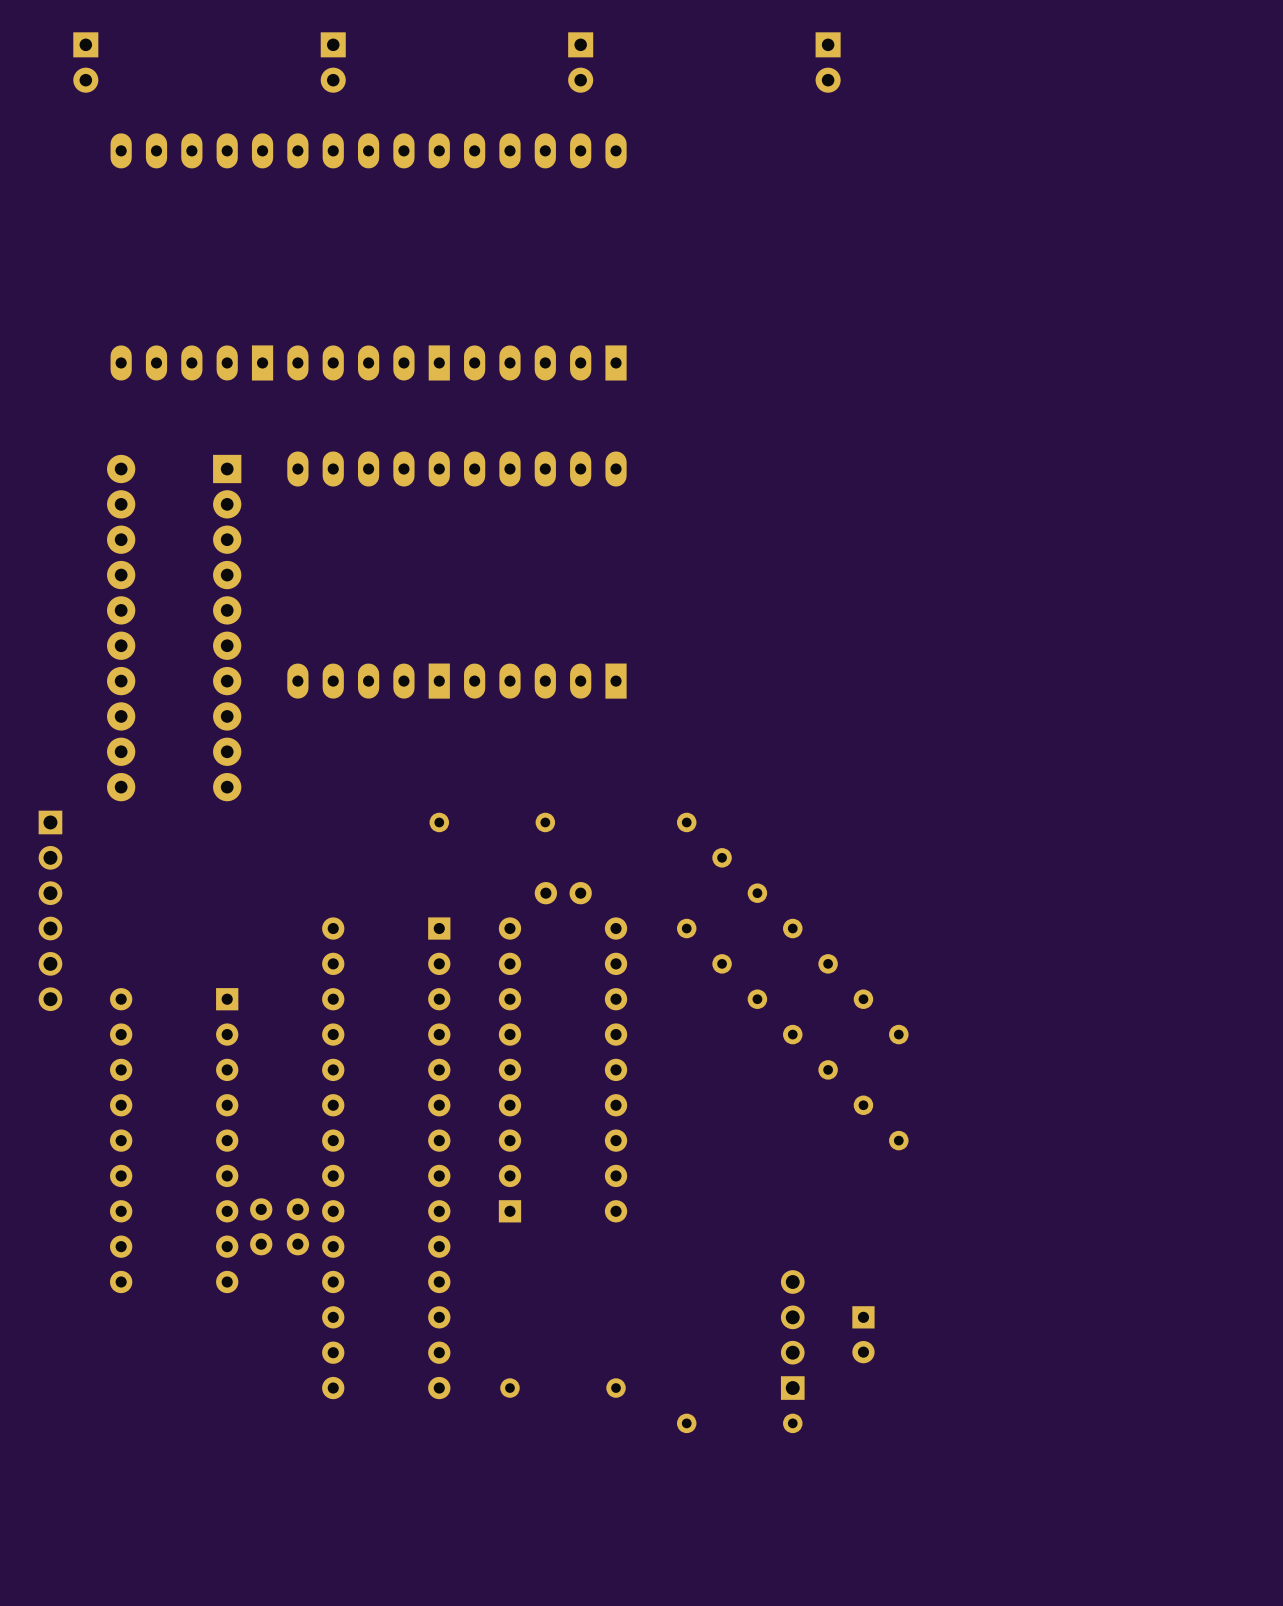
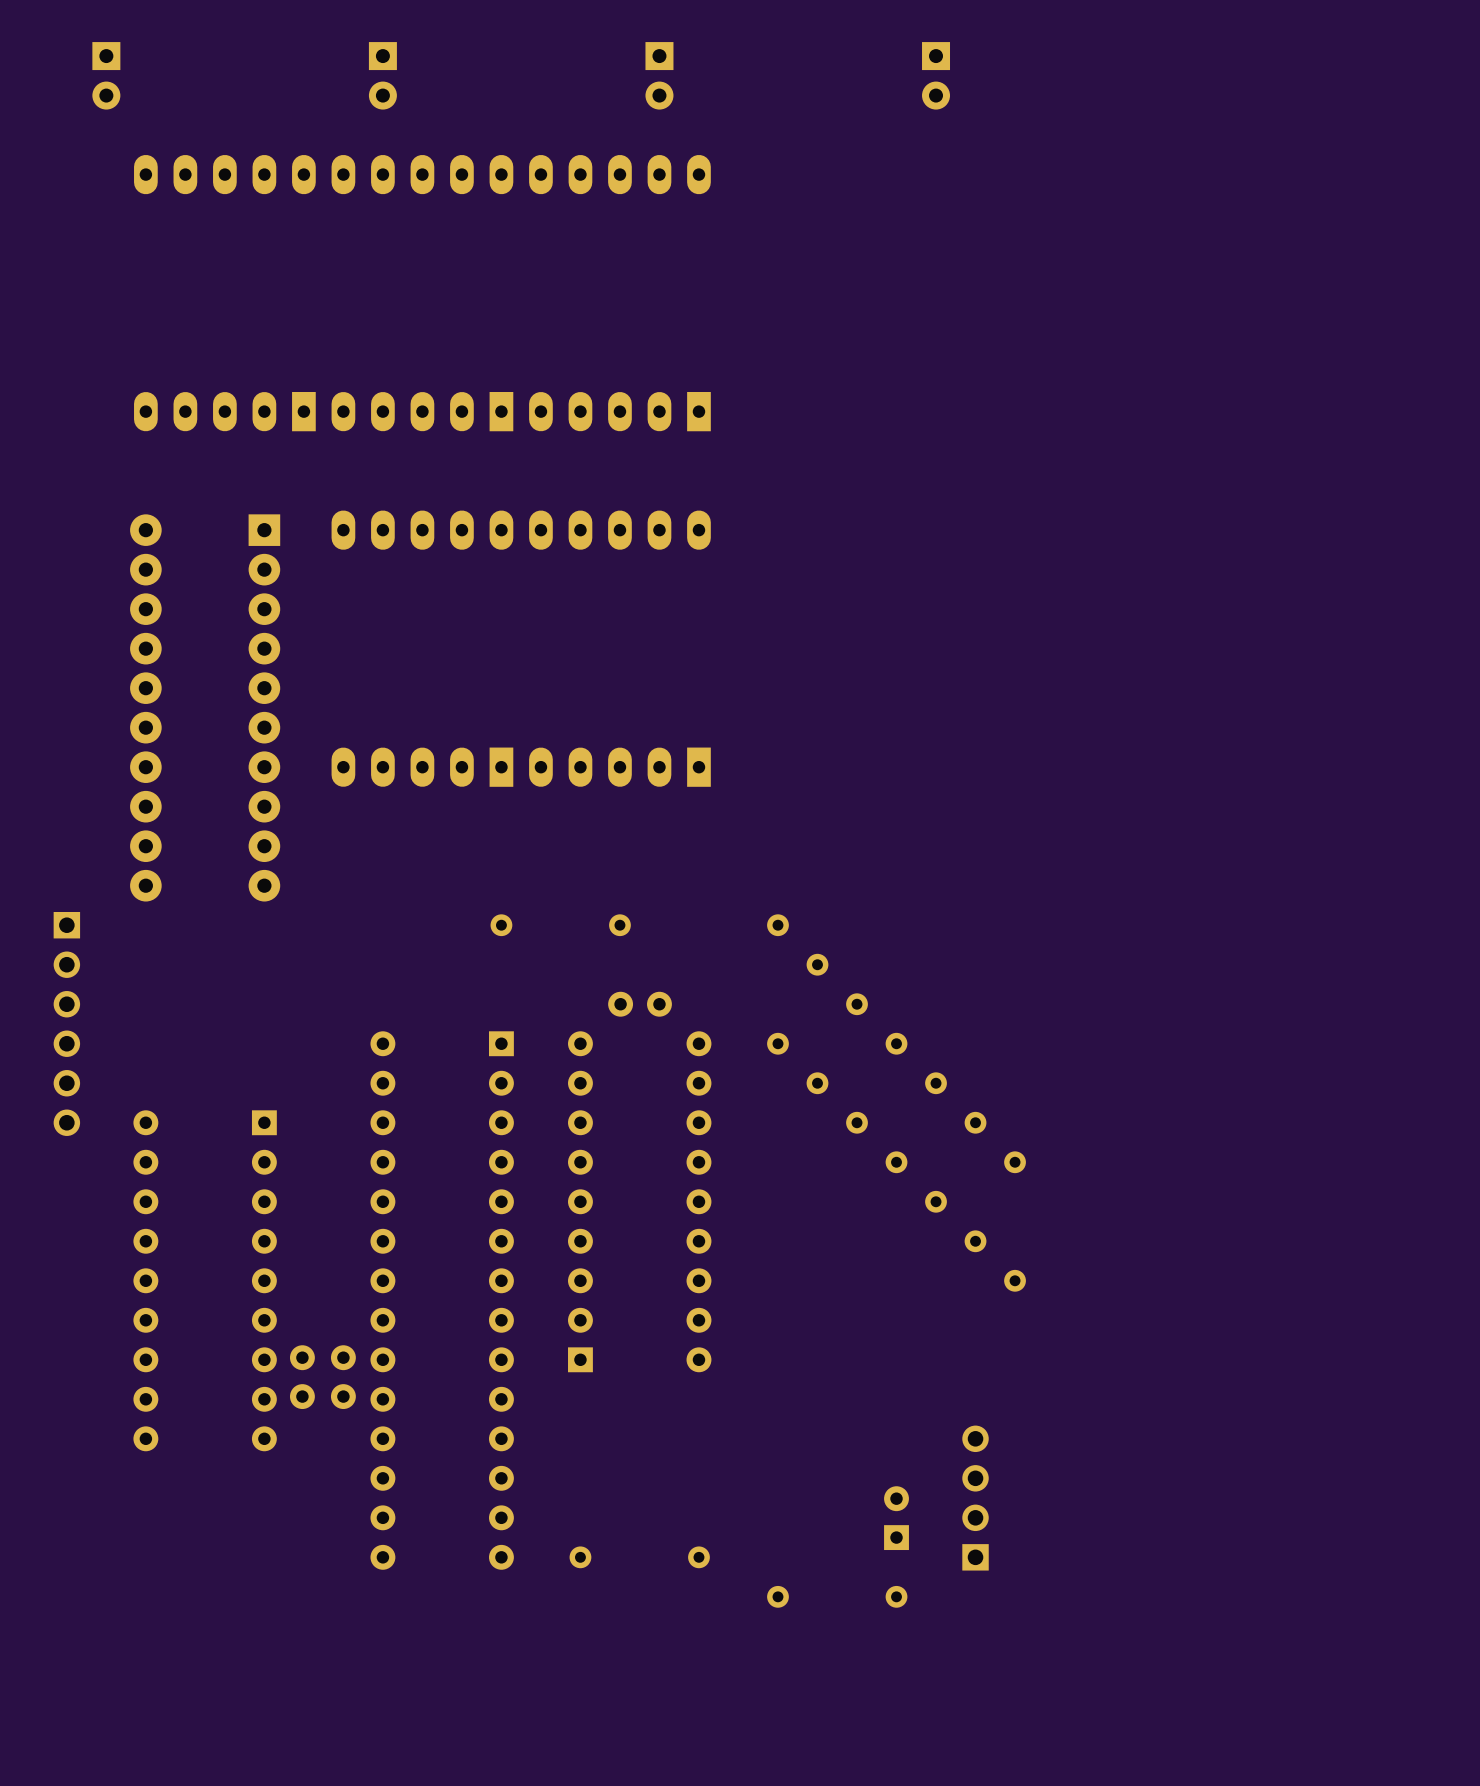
part footprint: [852, 1306, 875, 1364] -> [962, 1425, 989, 1571]
part: (792, 1335) -> none
part: none -> (896, 1518)

